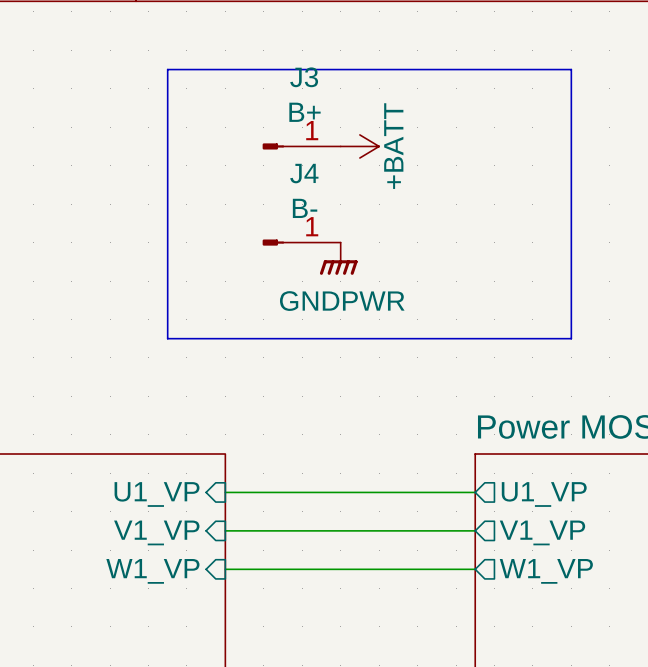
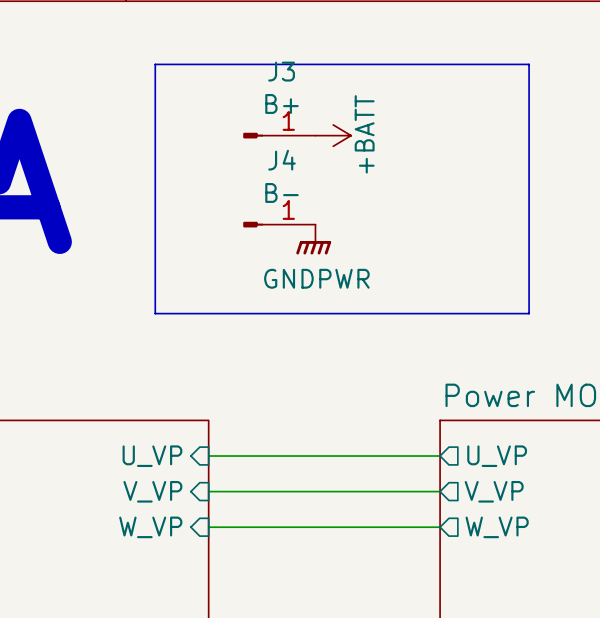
sheet pin: U1_VP (157, 494) -> U_VP (152, 456)
sheet pin: U1_VP (544, 494) -> U_VP (497, 456)
sheet pin: V1_VP (156, 532) -> V_VP (152, 491)
sheet pin: V1_VP (542, 532) -> V_VP (494, 491)
sheet pin: W1_VP (152, 571) -> W_VP (150, 527)
sheet pin: W1_VP (546, 571) -> W_VP (497, 527)

